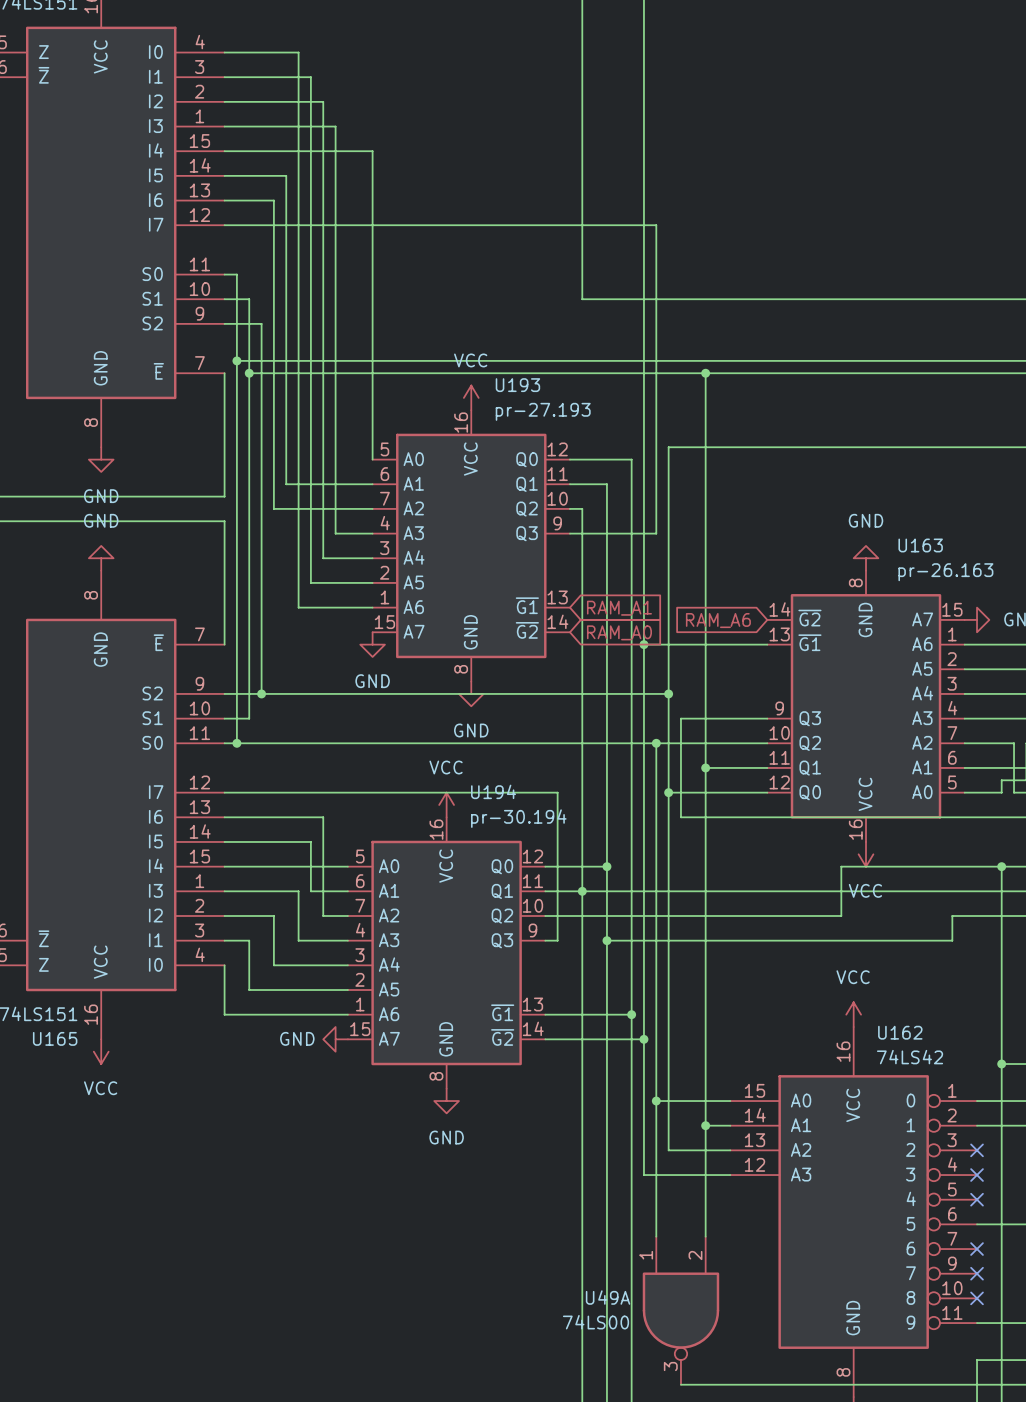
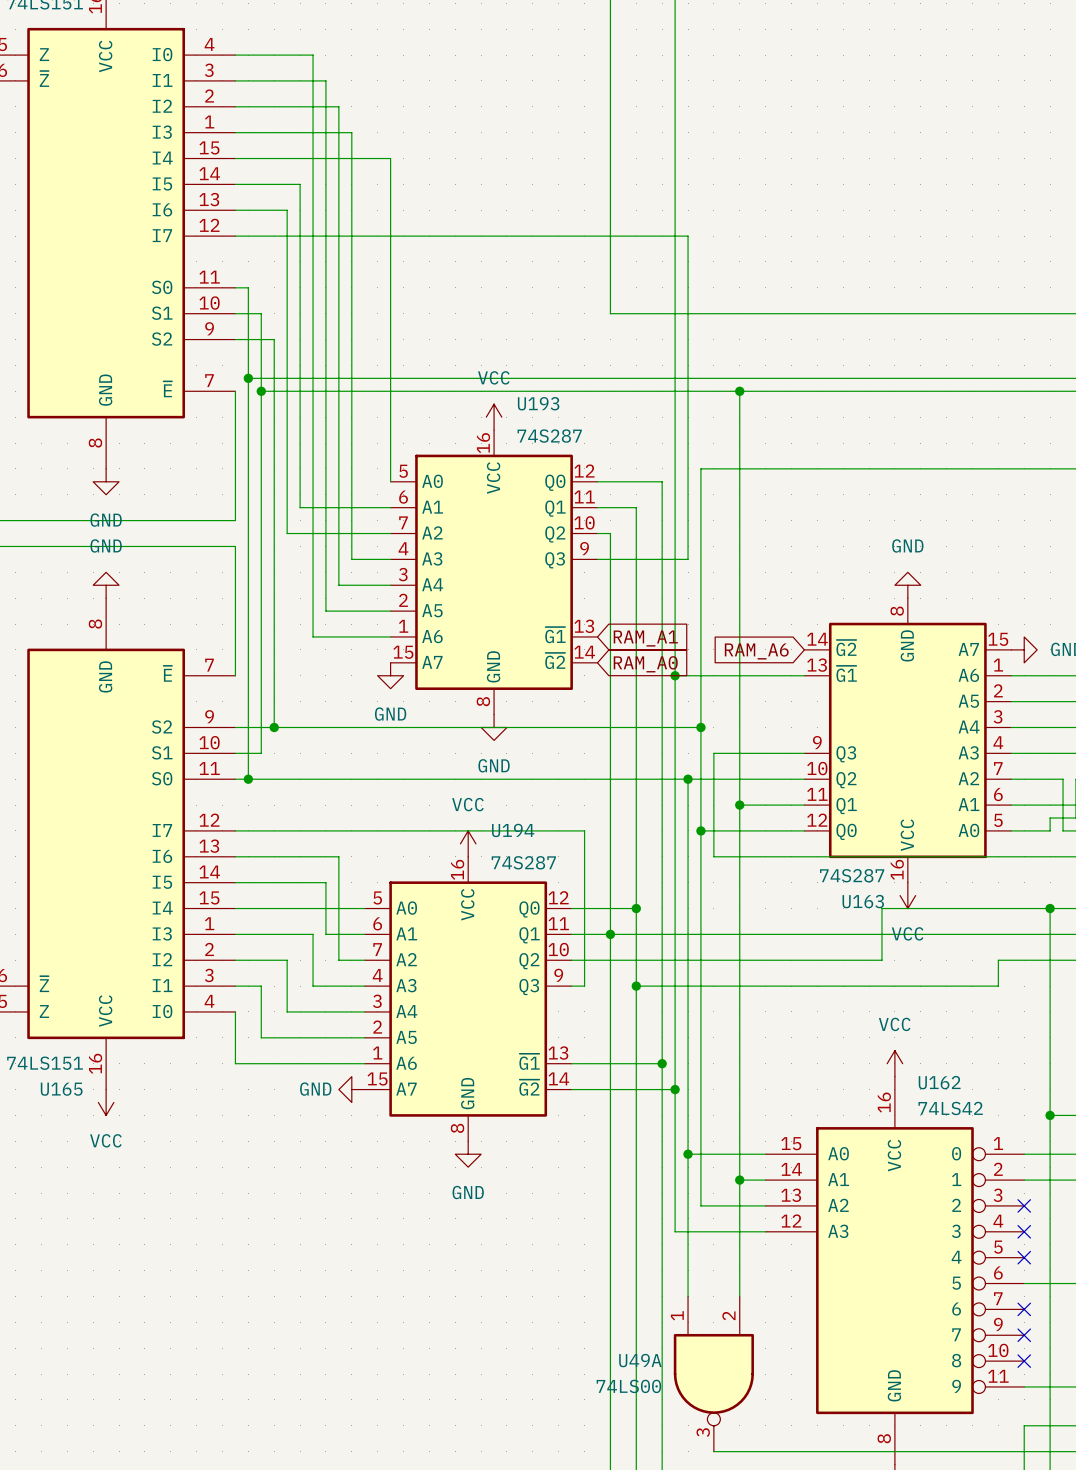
U193 value: pr-27.193 (543, 411) -> 74S287 (549, 436)
U163 name position: U163 (920, 545) -> U163 (863, 901)
U163 value: pr-26.163 (945, 572) -> 74S287 (852, 875)
U194 value: pr-30.194 (518, 818) -> 74S287 (523, 862)

